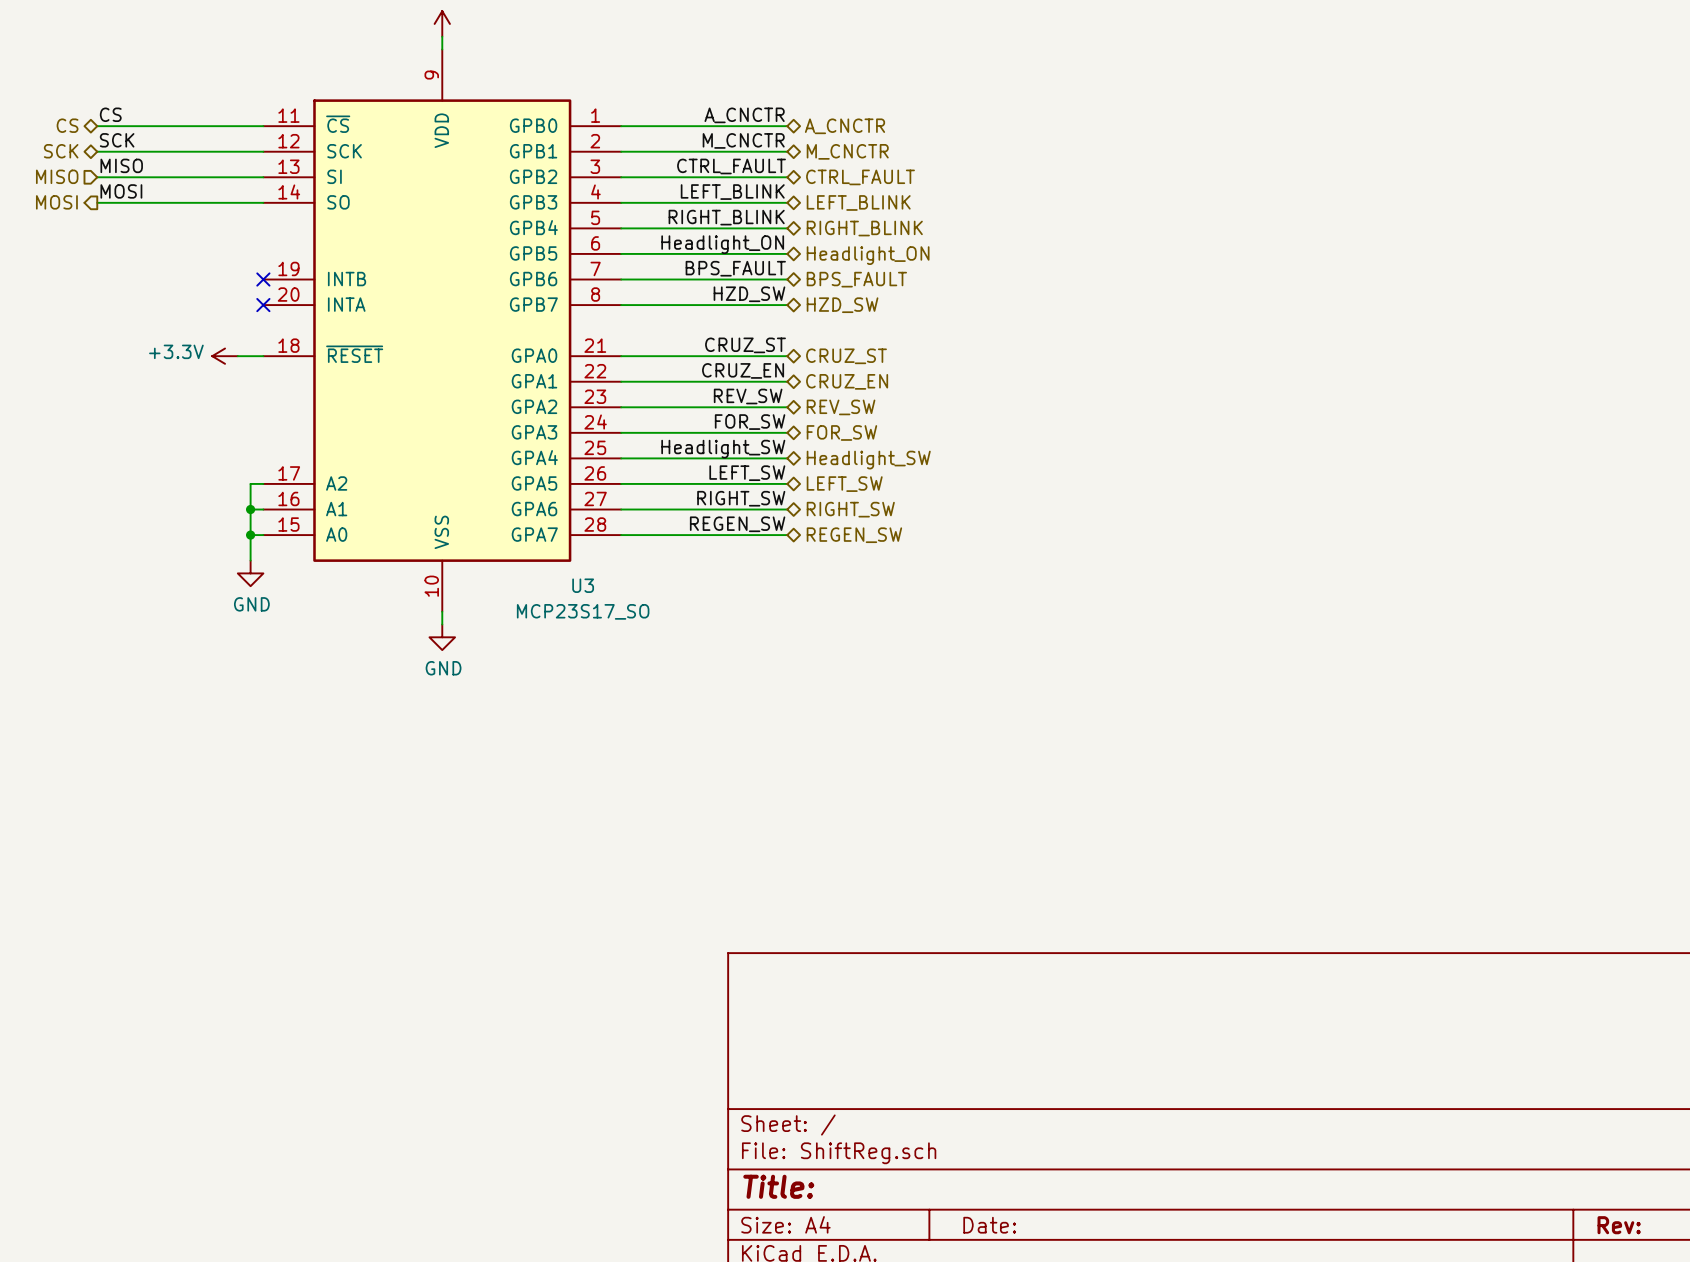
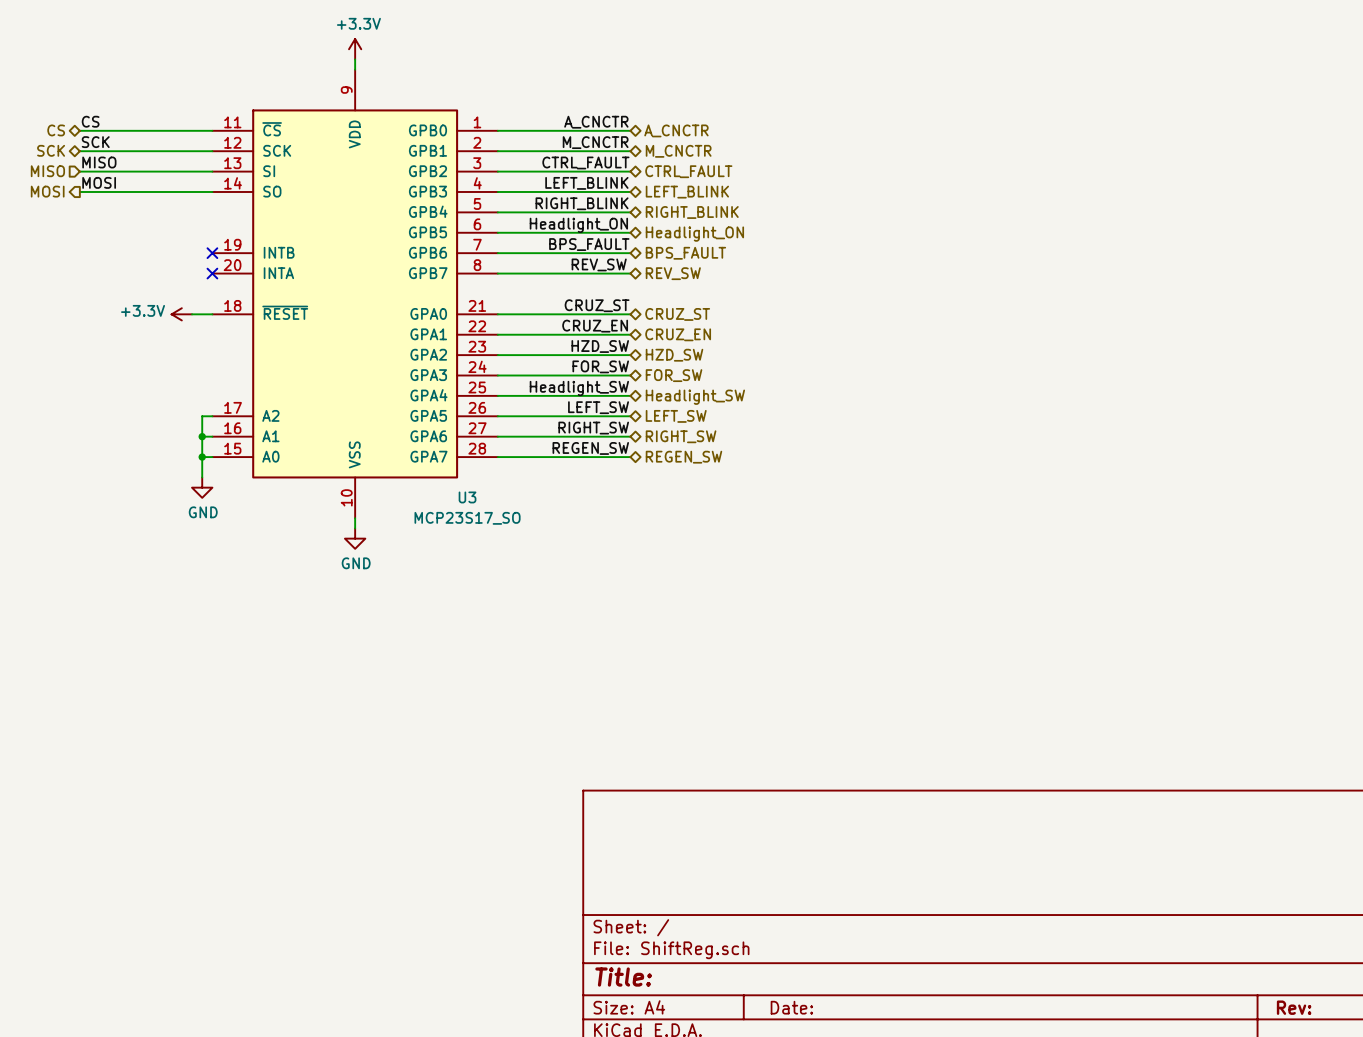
label position: HZD_SW (749, 294) -> HZD_SW (600, 346)
hierarchical label: HZD_SW (842, 305) -> REV_SW (673, 273)
label position: REV_SW (748, 396) -> REV_SW (599, 264)
hierarchical label: REV_SW (841, 407) -> HZD_SW (674, 355)

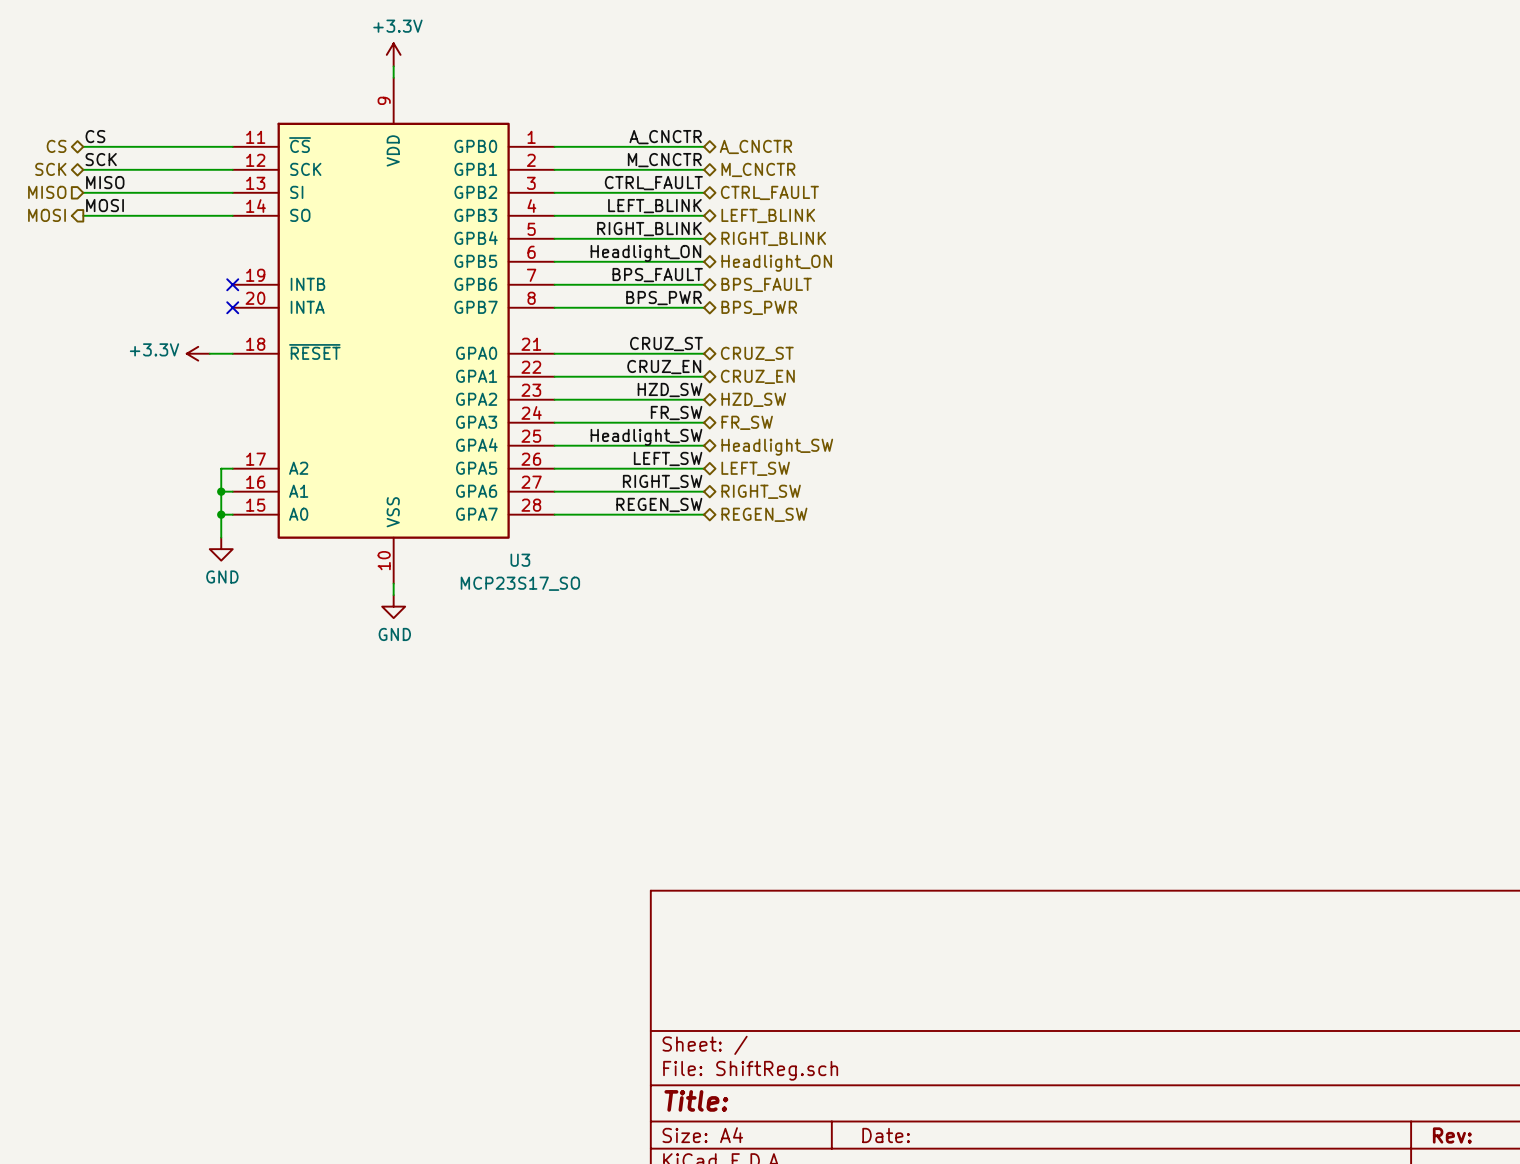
label: none -> BPS_PWR (663, 298)
label: REV_SW (599, 264) -> none
hierarchical label: REV_SW (673, 273) -> BPS_PWR (759, 307)
label: FOR_SW (600, 366) -> FR_SW (676, 412)
hierarchical label: FOR_SW (674, 375) -> FR_SW (747, 422)

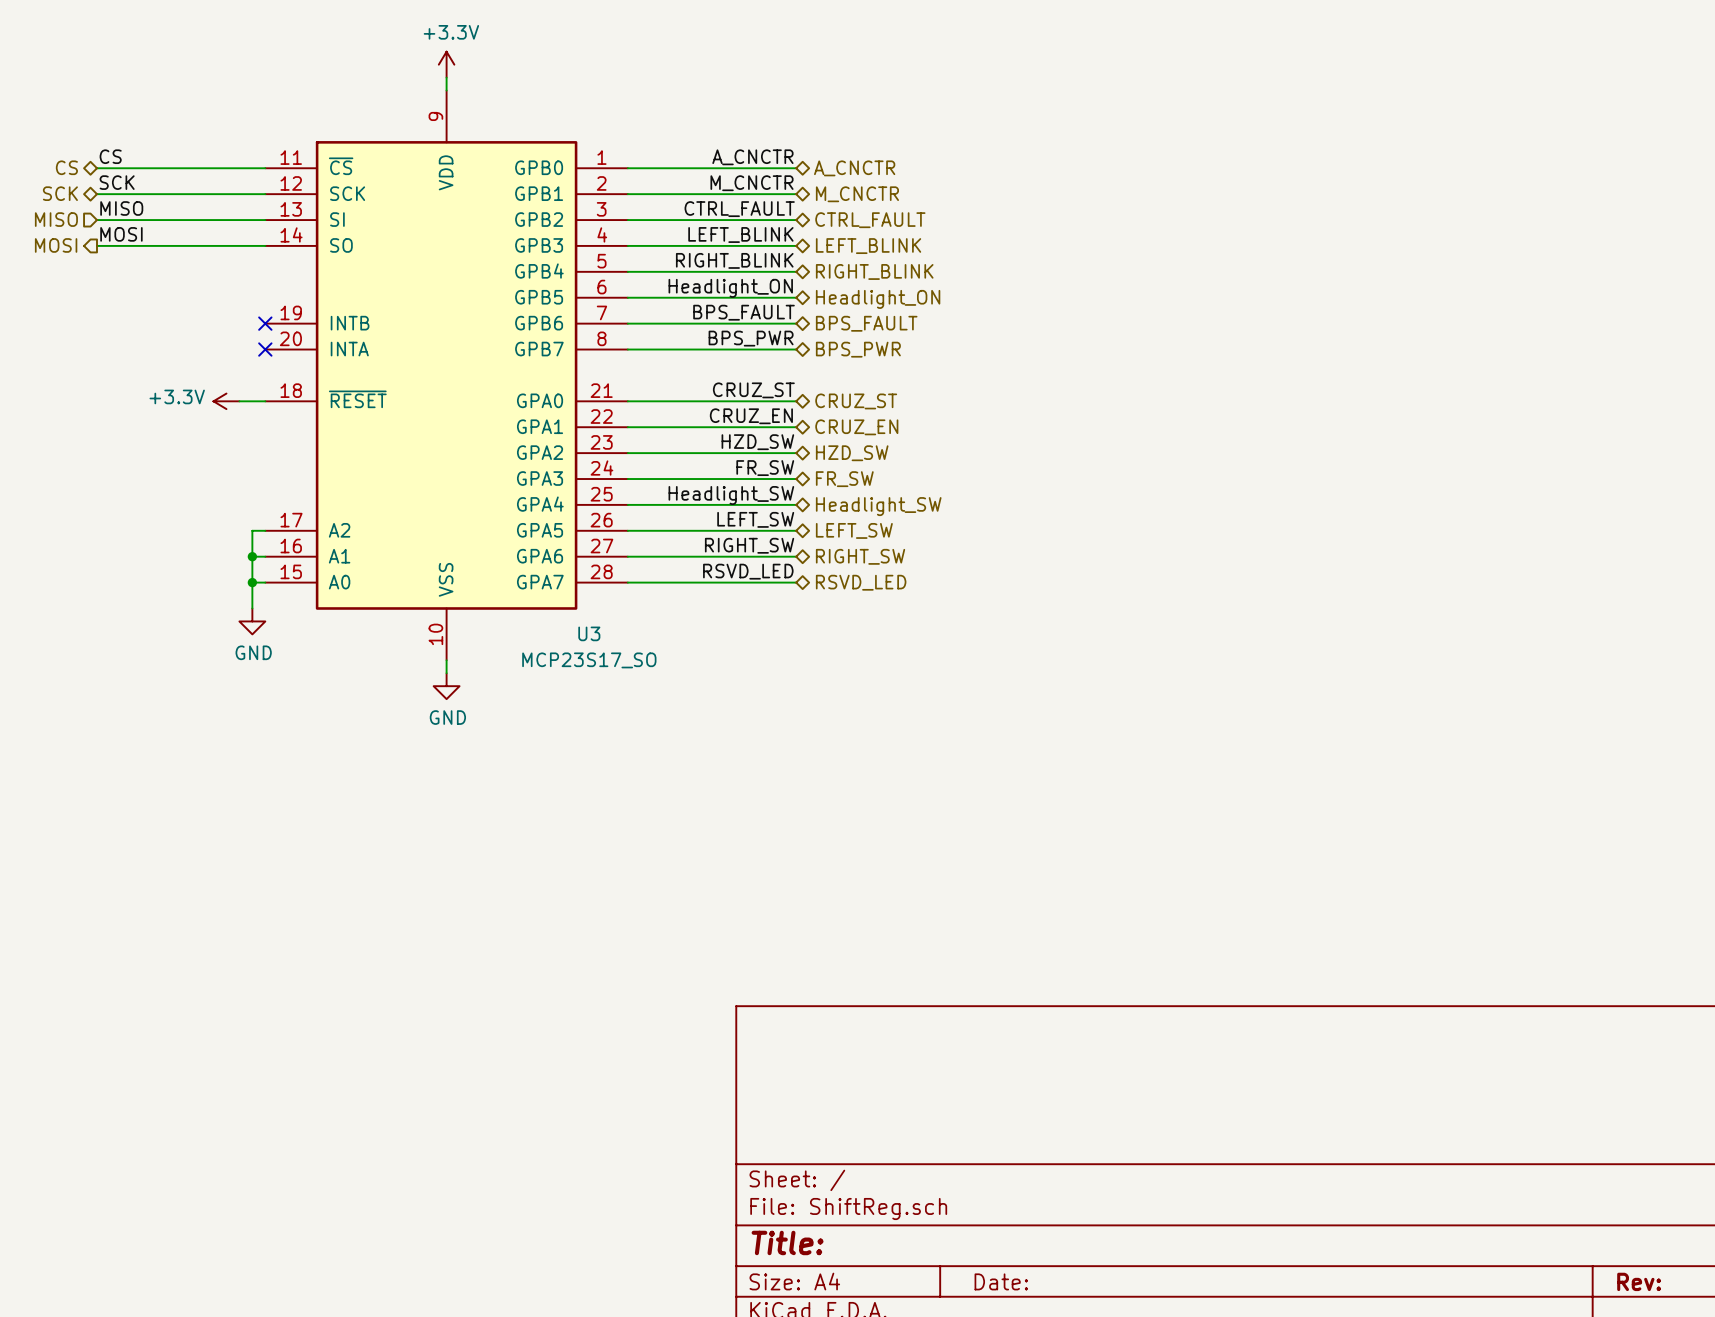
label: REGEN_SW (659, 504) -> RSVD_LED (748, 571)
hierarchical label: REGEN_SW (764, 514) -> RSVD_LED (861, 582)

